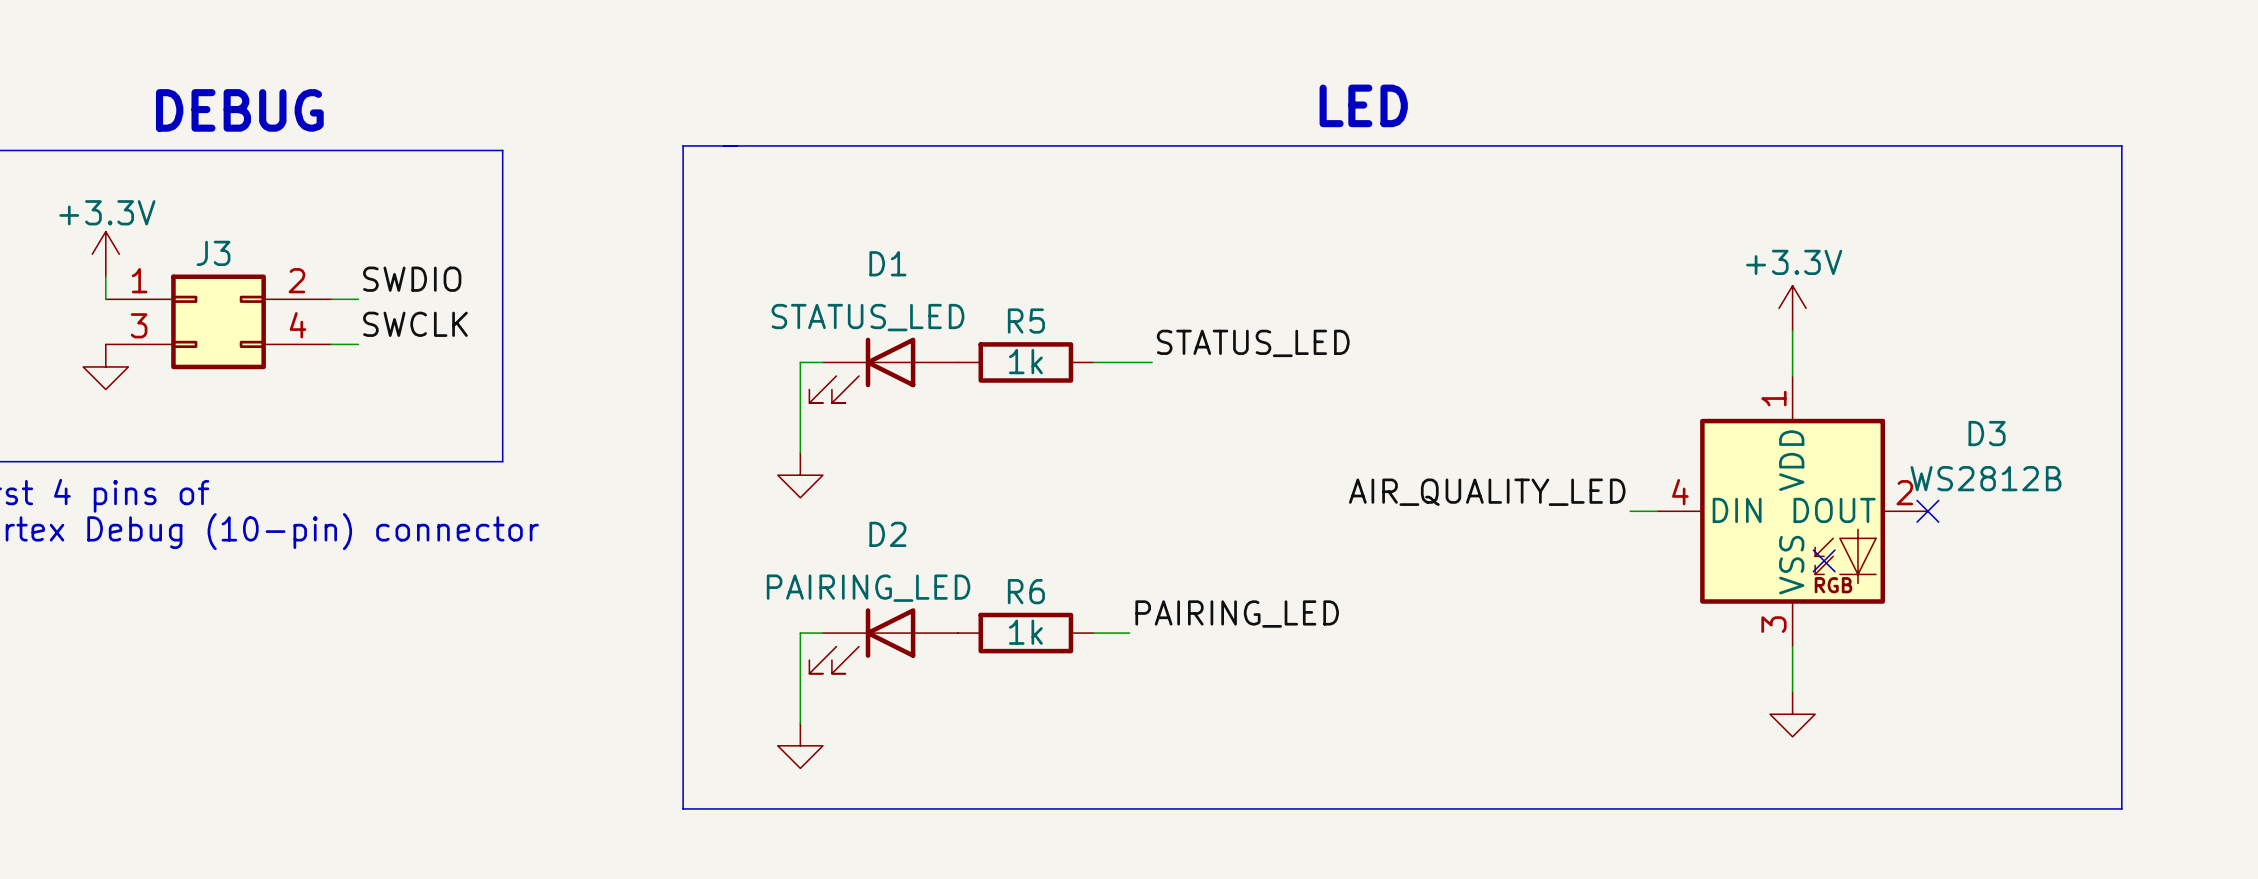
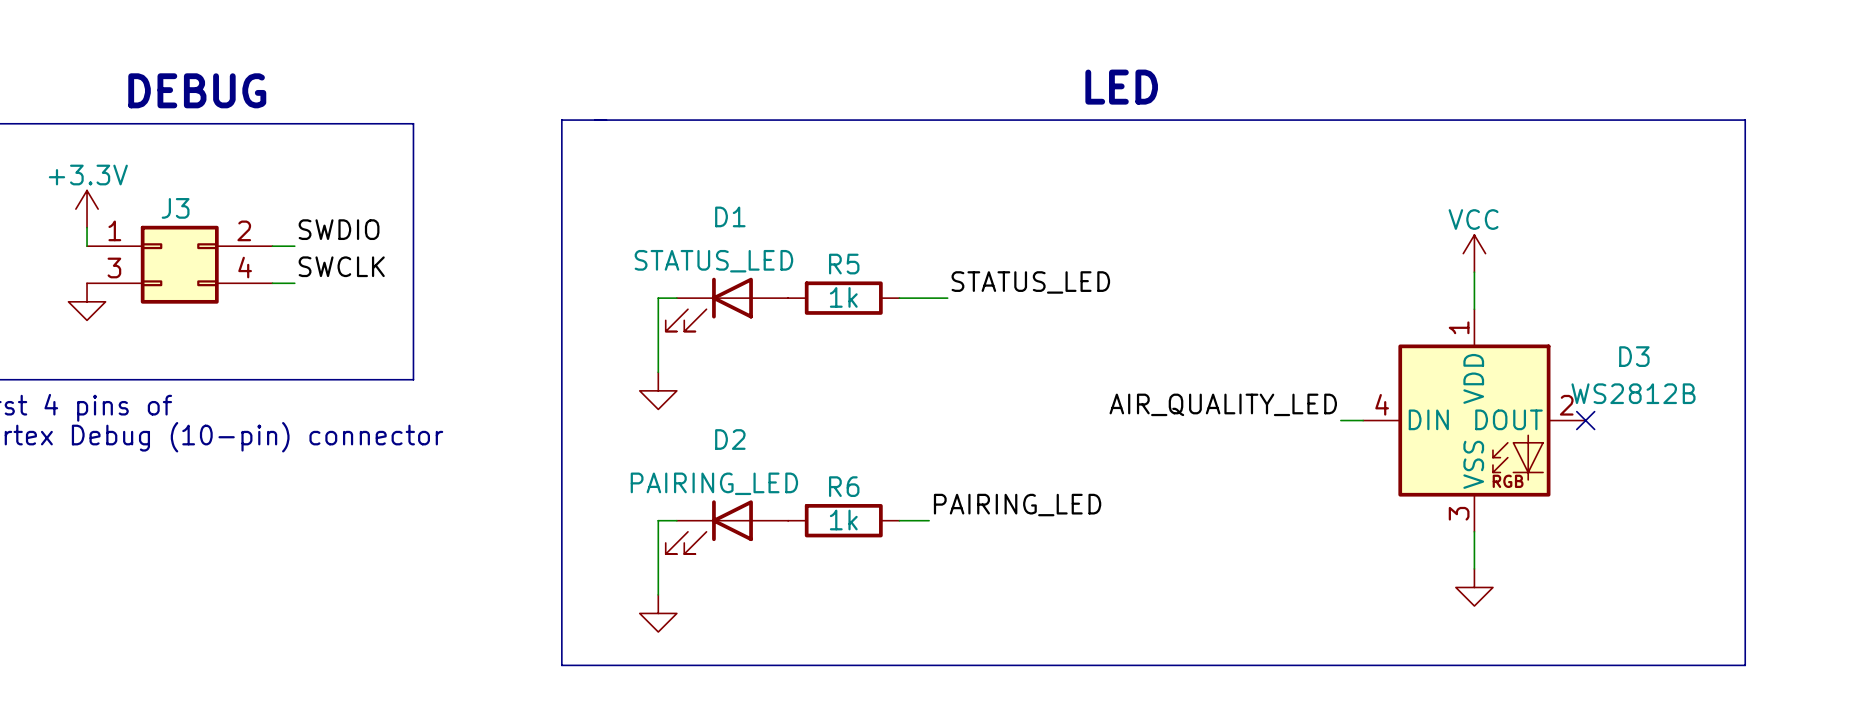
power symbol: +3.3V (1792, 308) -> VCC (1474, 253)
no-connect mark: (1824, 560) -> none

